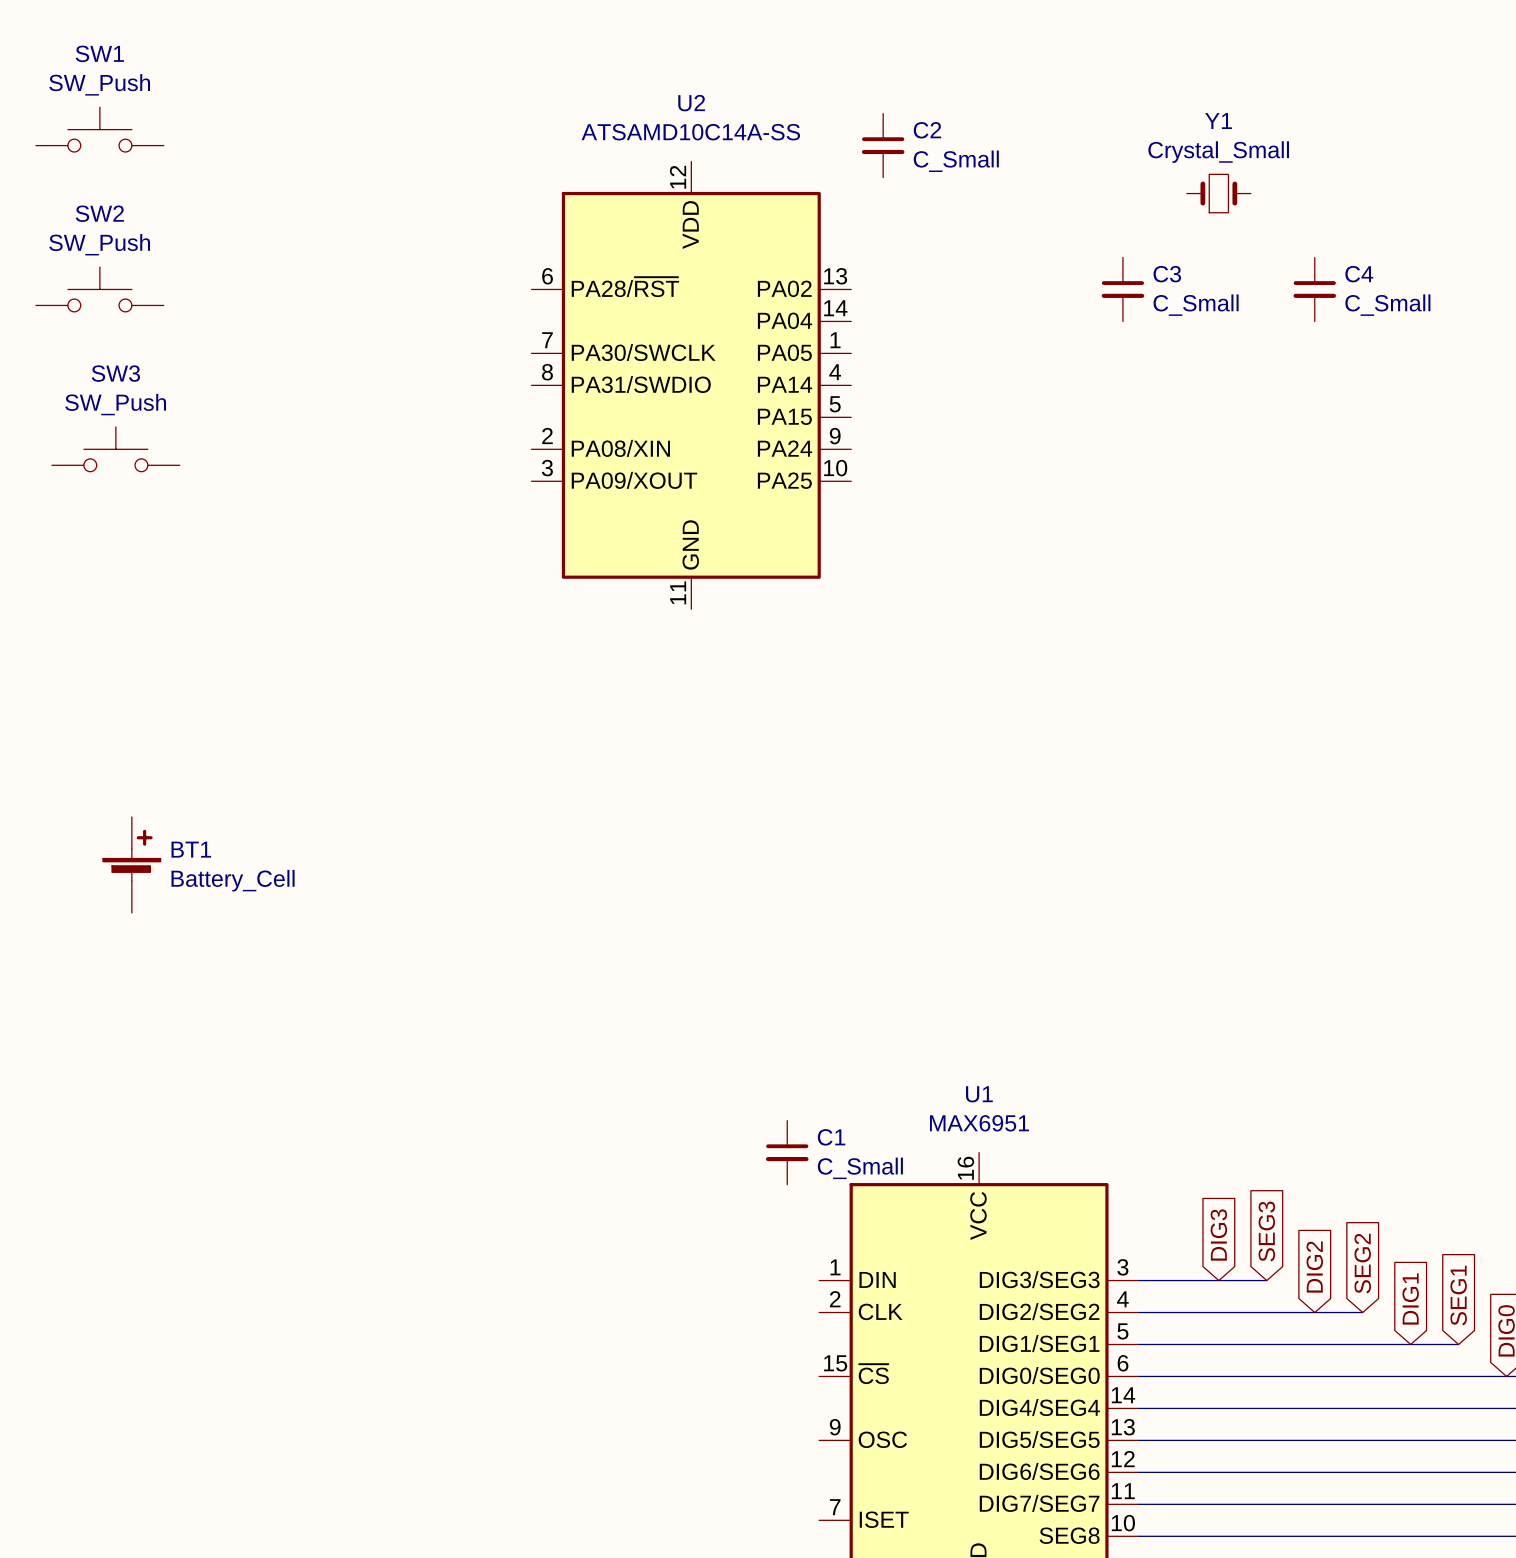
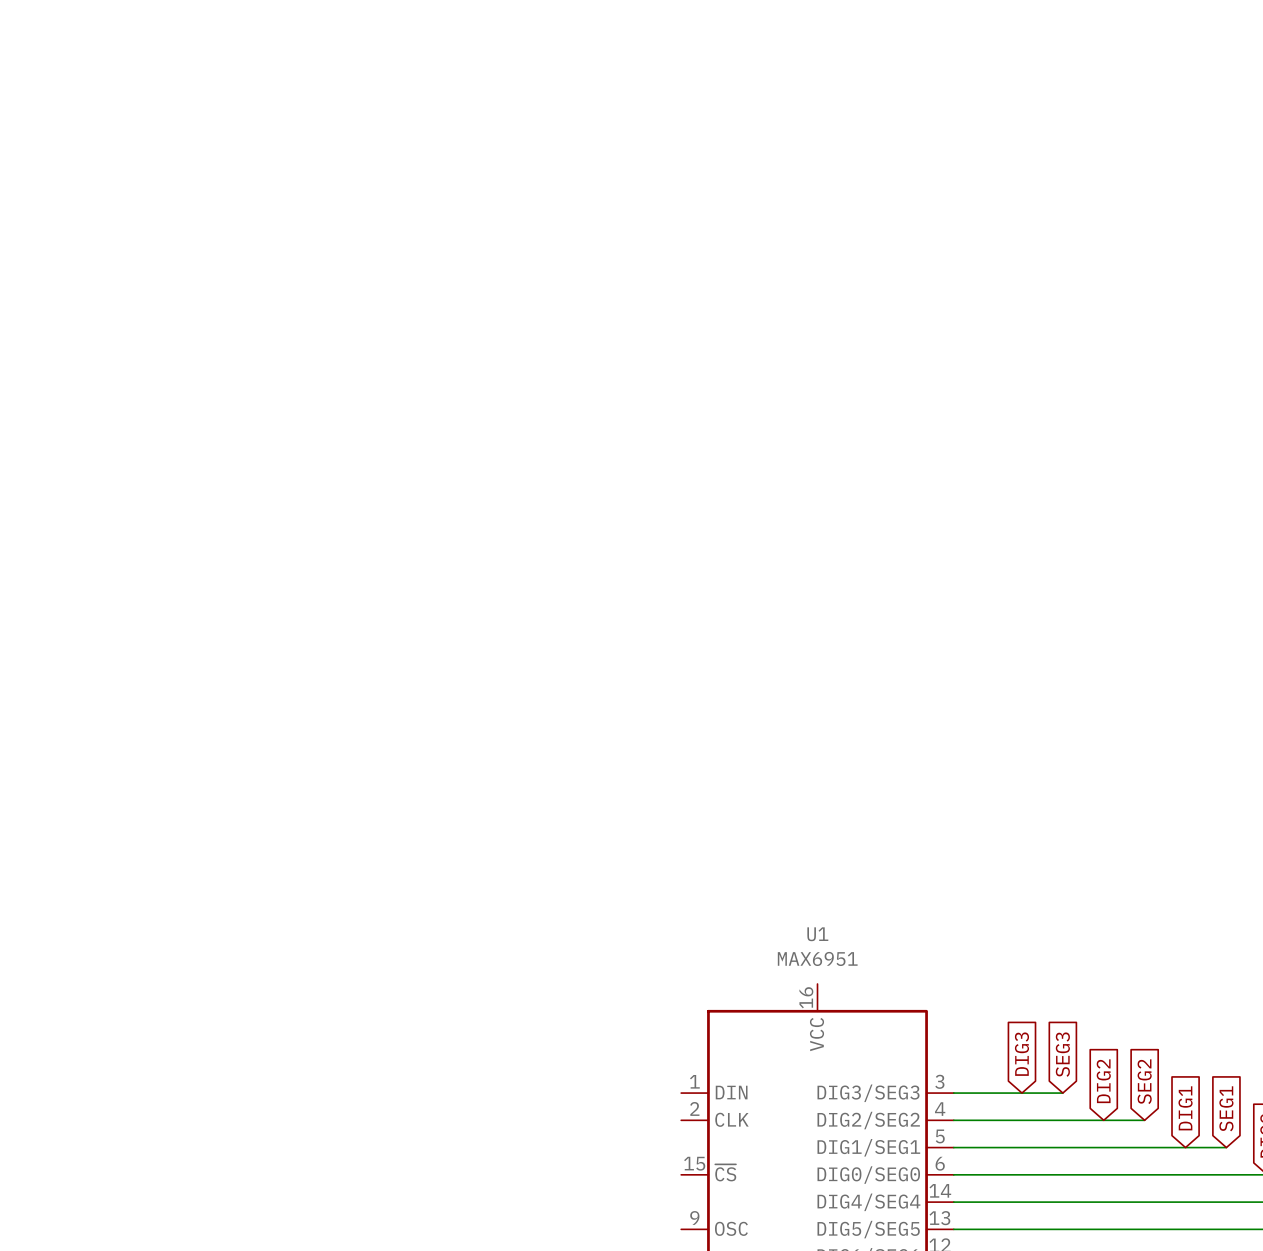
SW1: SW_Push (99, 129) -> none
C2: C_Small (883, 145) -> none
Y1: Crystal_Small (1218, 193) -> none
SW2: SW_Push (99, 289) -> none
C3: C_Small (1122, 289) -> none
C4: C_Small (1314, 289) -> none
U2: ATSAMD10C14A-SS (691, 385) -> none
SW3: SW_Push (115, 449) -> none
BT1: Battery_Cell (131, 864) -> none
C1: C_Small (787, 1152) -> none

